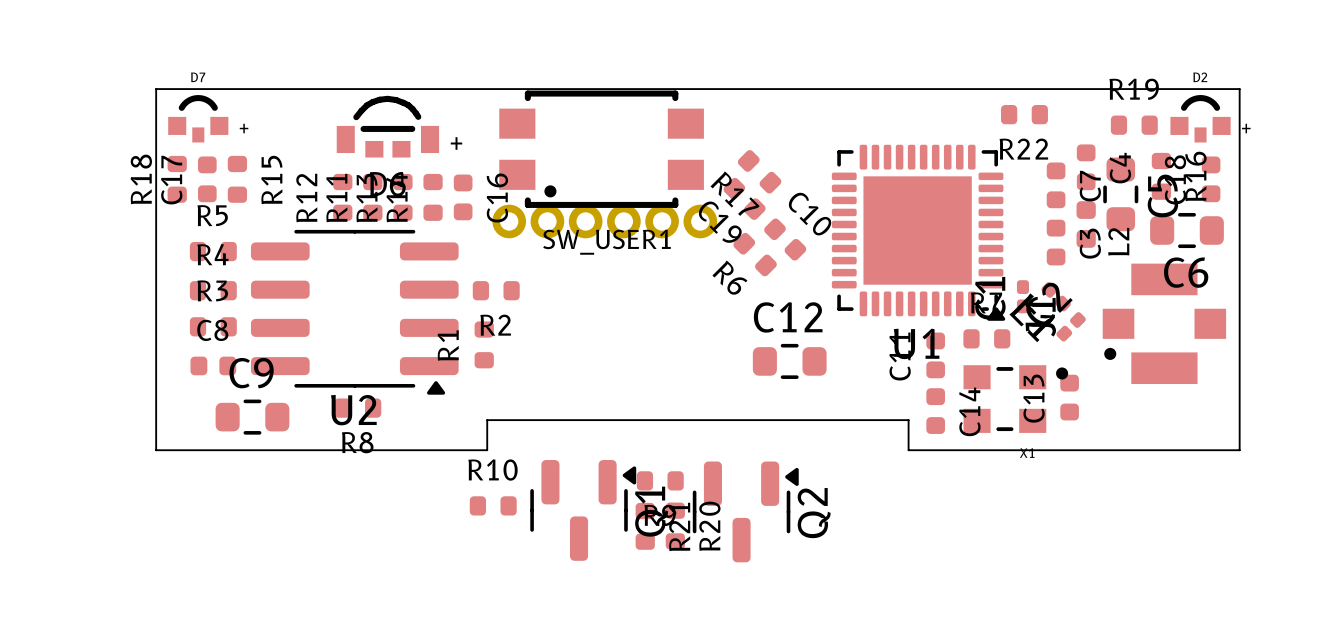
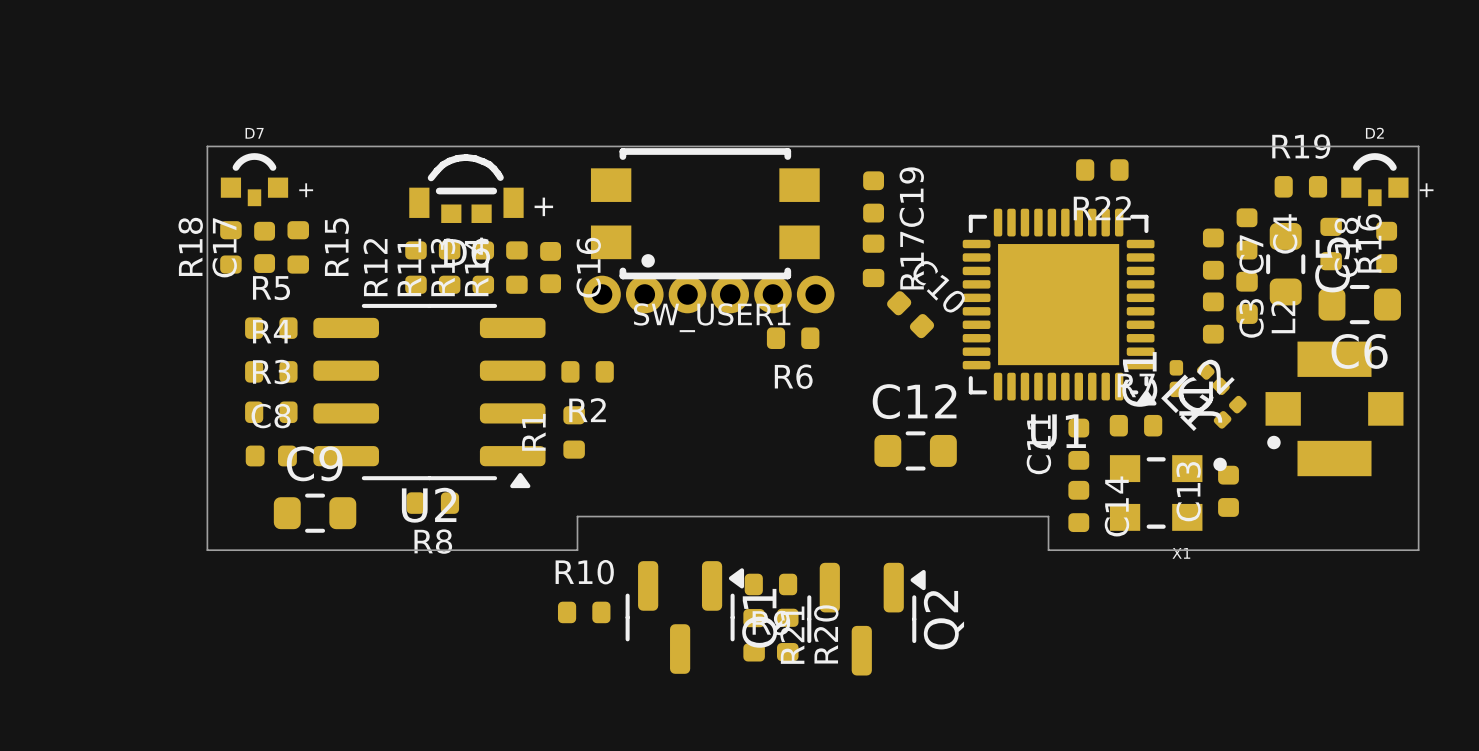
R22 position: (1024, 114) -> (1102, 170)
R17 rotation: 0° (759, 171) -> 45° clockwise (873, 260)
R17 name position: R17 (735, 193) -> R17 (912, 260)
C19 rotation: 0° (744, 198) -> 45° clockwise (873, 196)
C19 position: (744, 198) -> (873, 196)
C19 name position: C19 (720, 222) -> C19 (911, 197)
R6 rotation: 0° (755, 254) -> 45° counterclockwise (793, 338)
R6 position: (755, 254) -> (793, 338)

